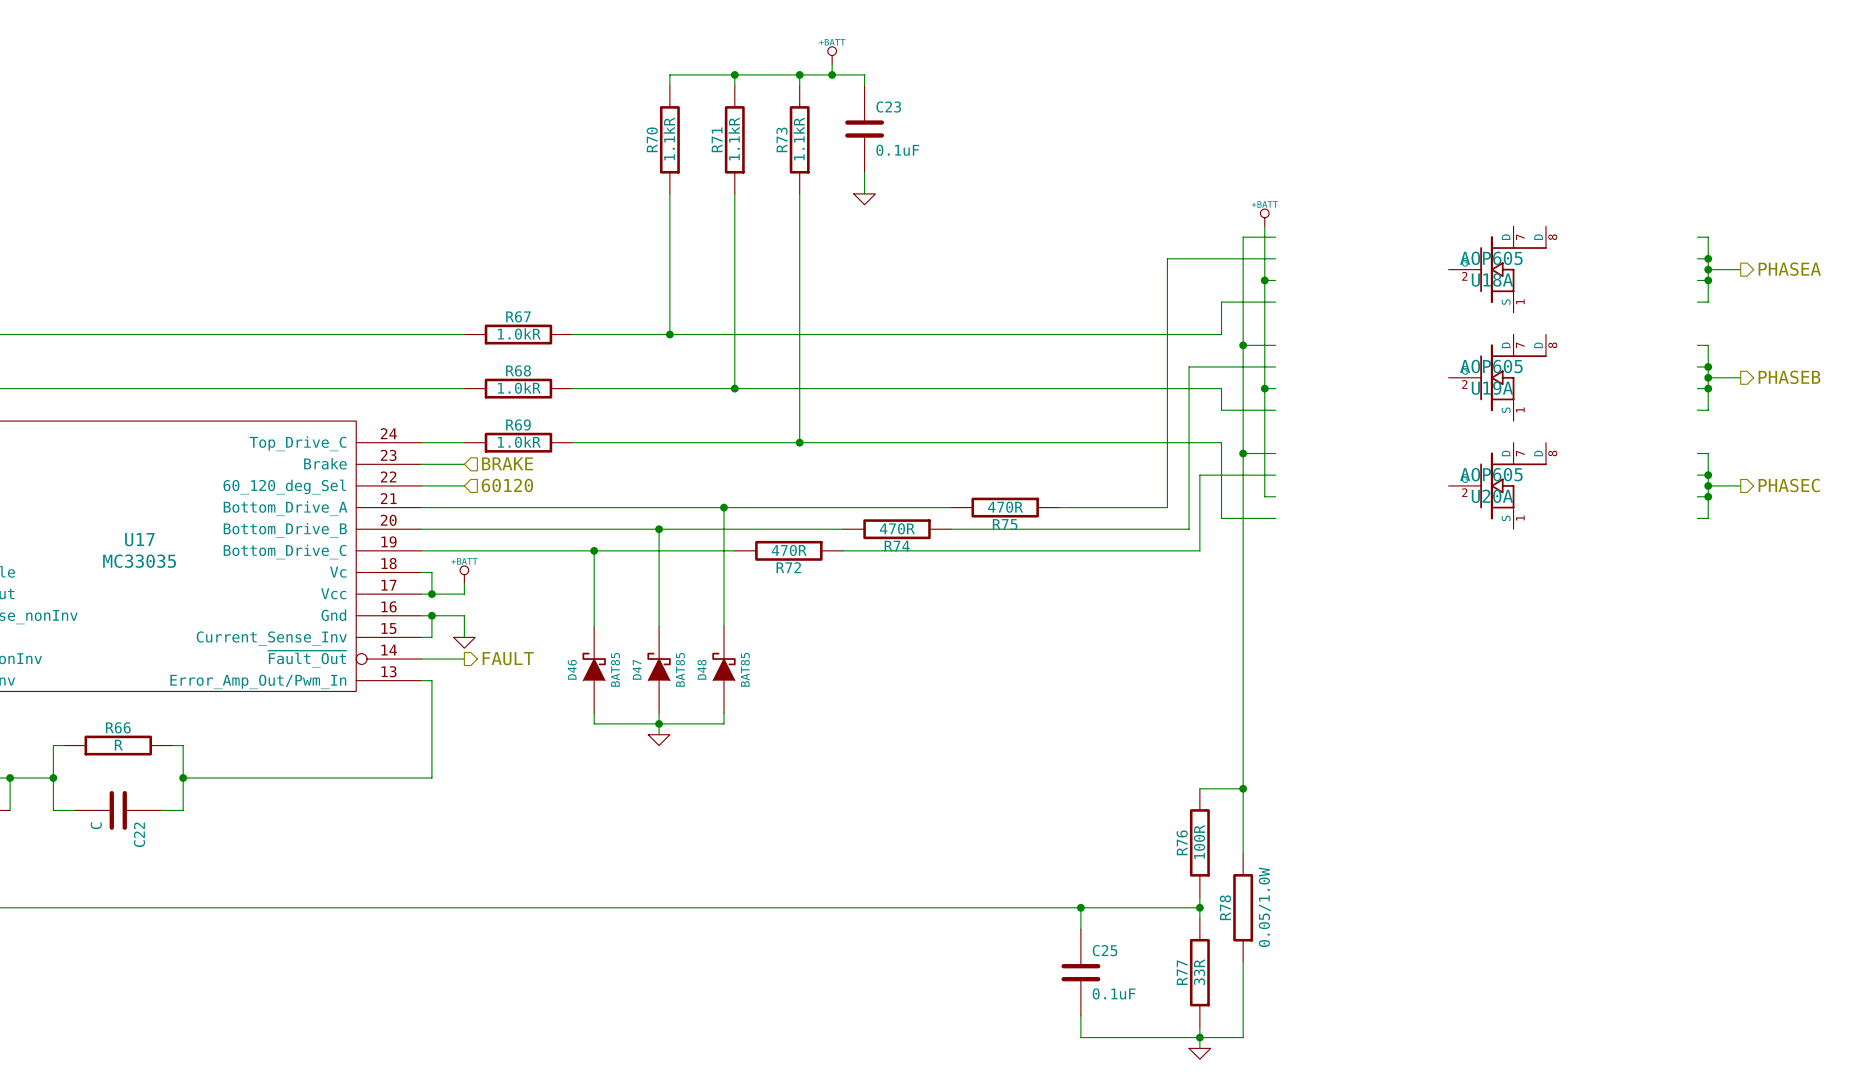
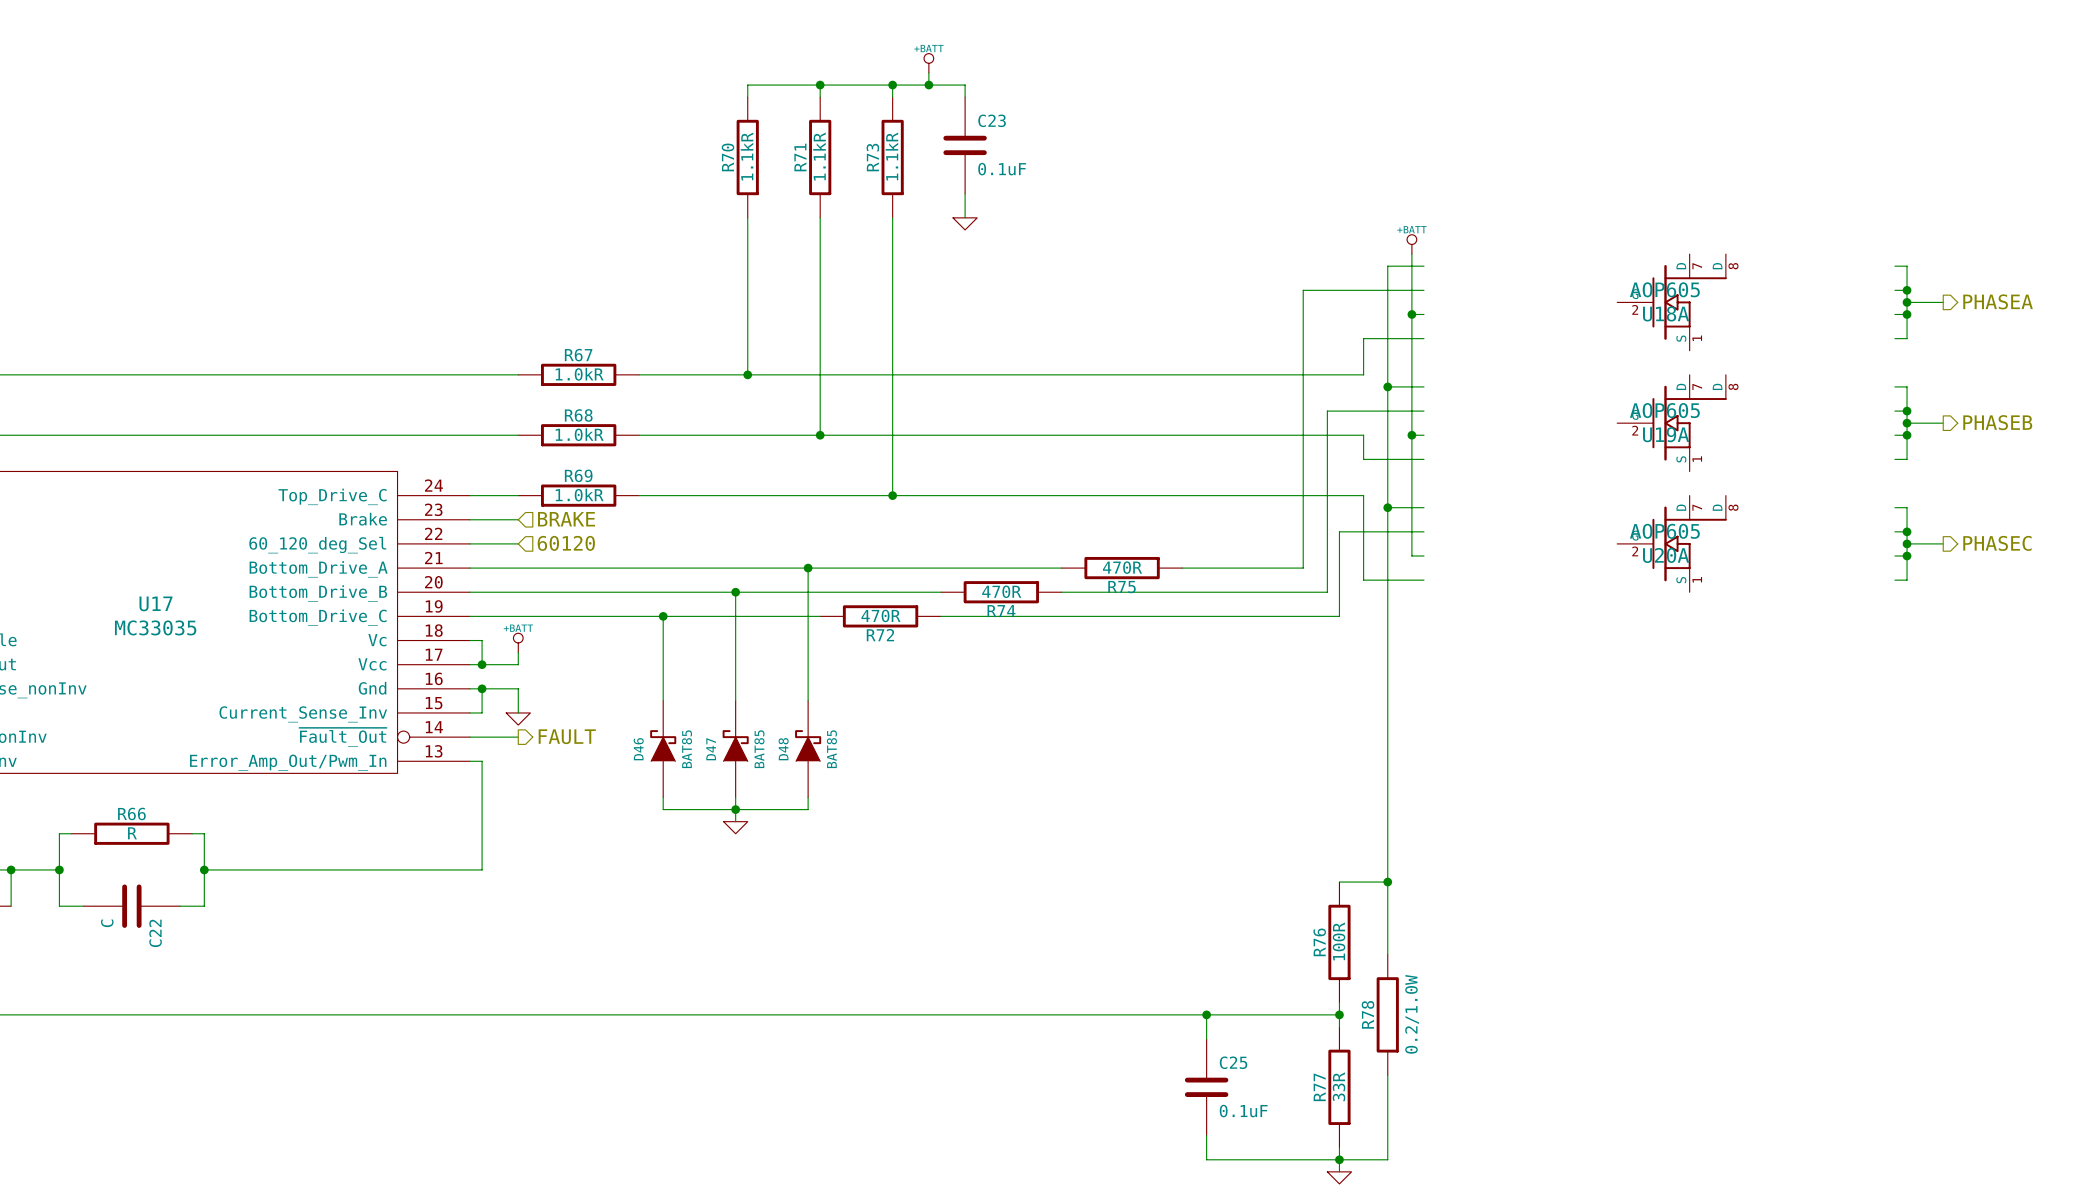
R78 value: 0.05/1.0W (1264, 907) -> 0.2/1.0W (1412, 1014)

